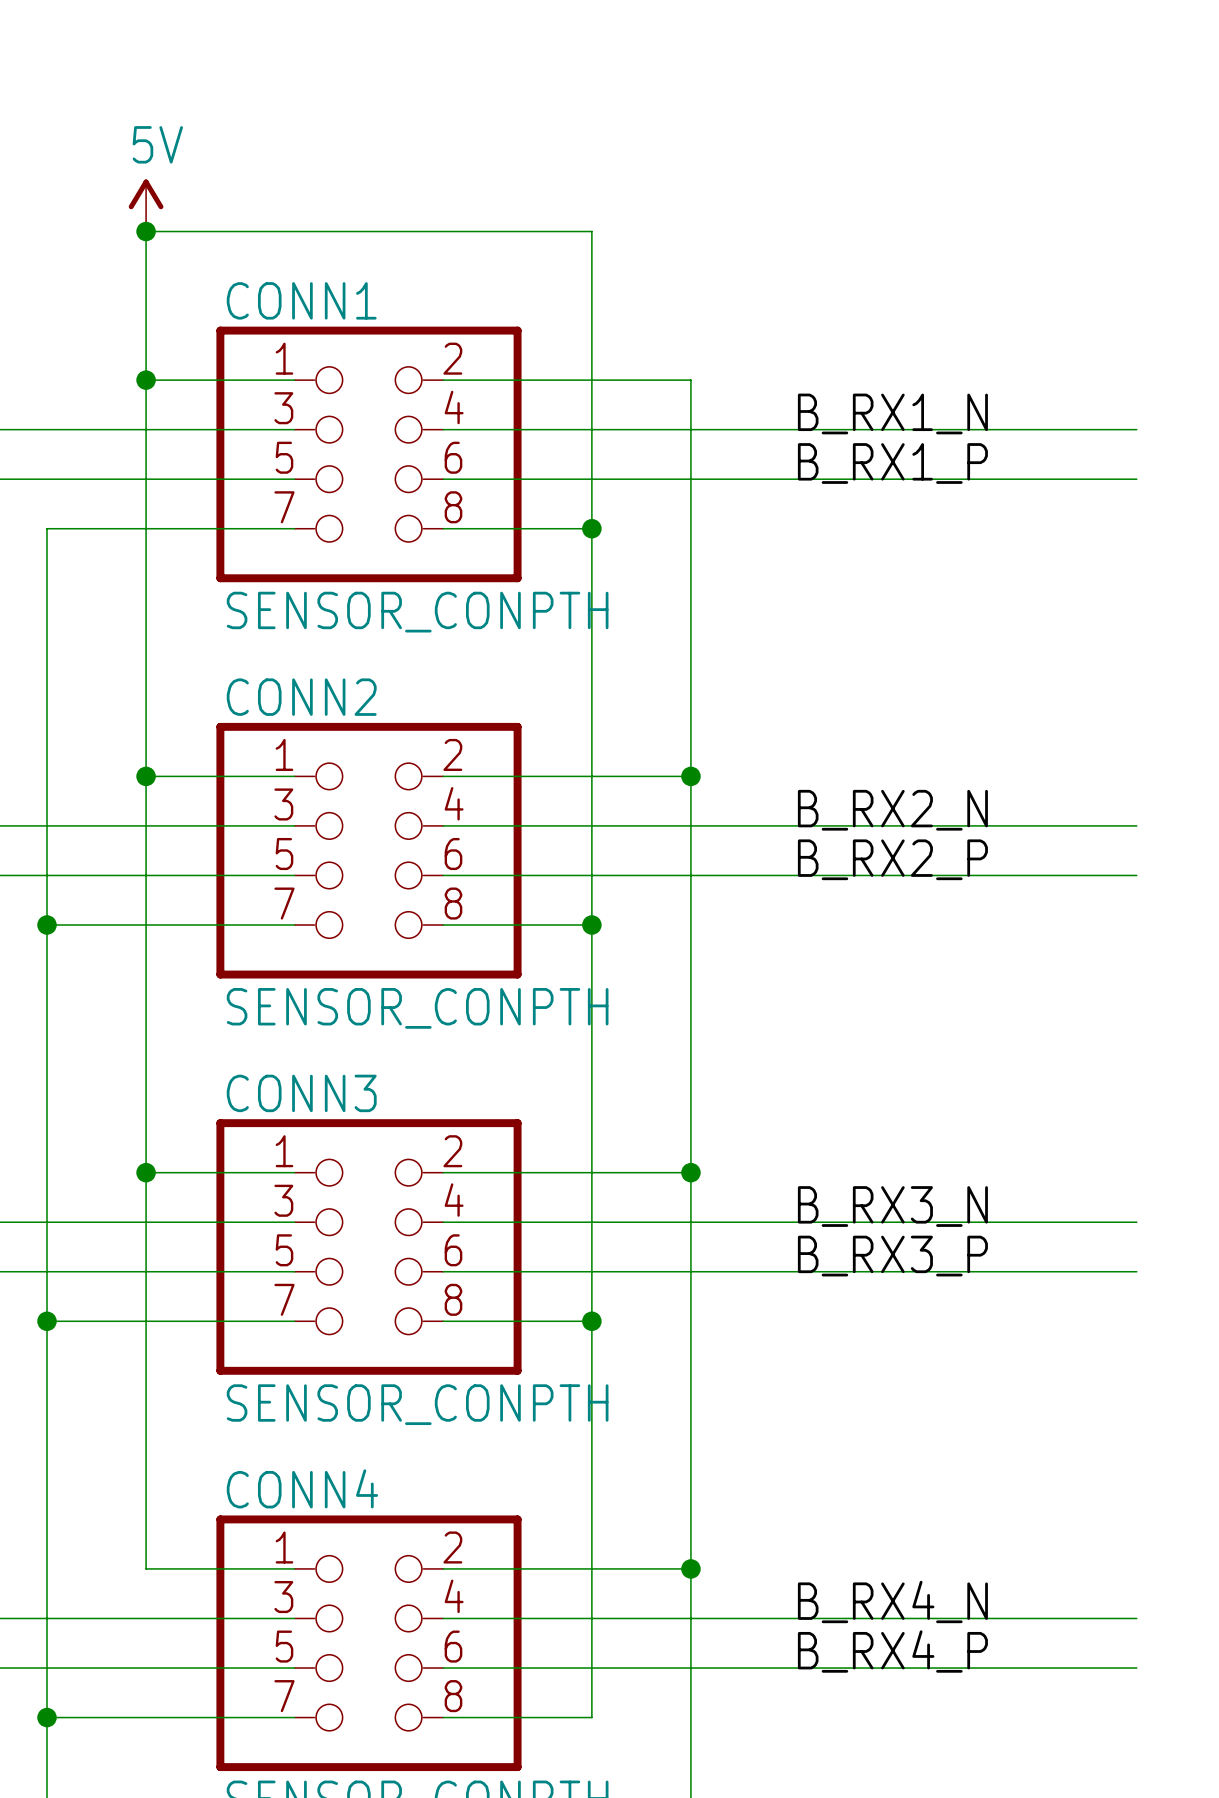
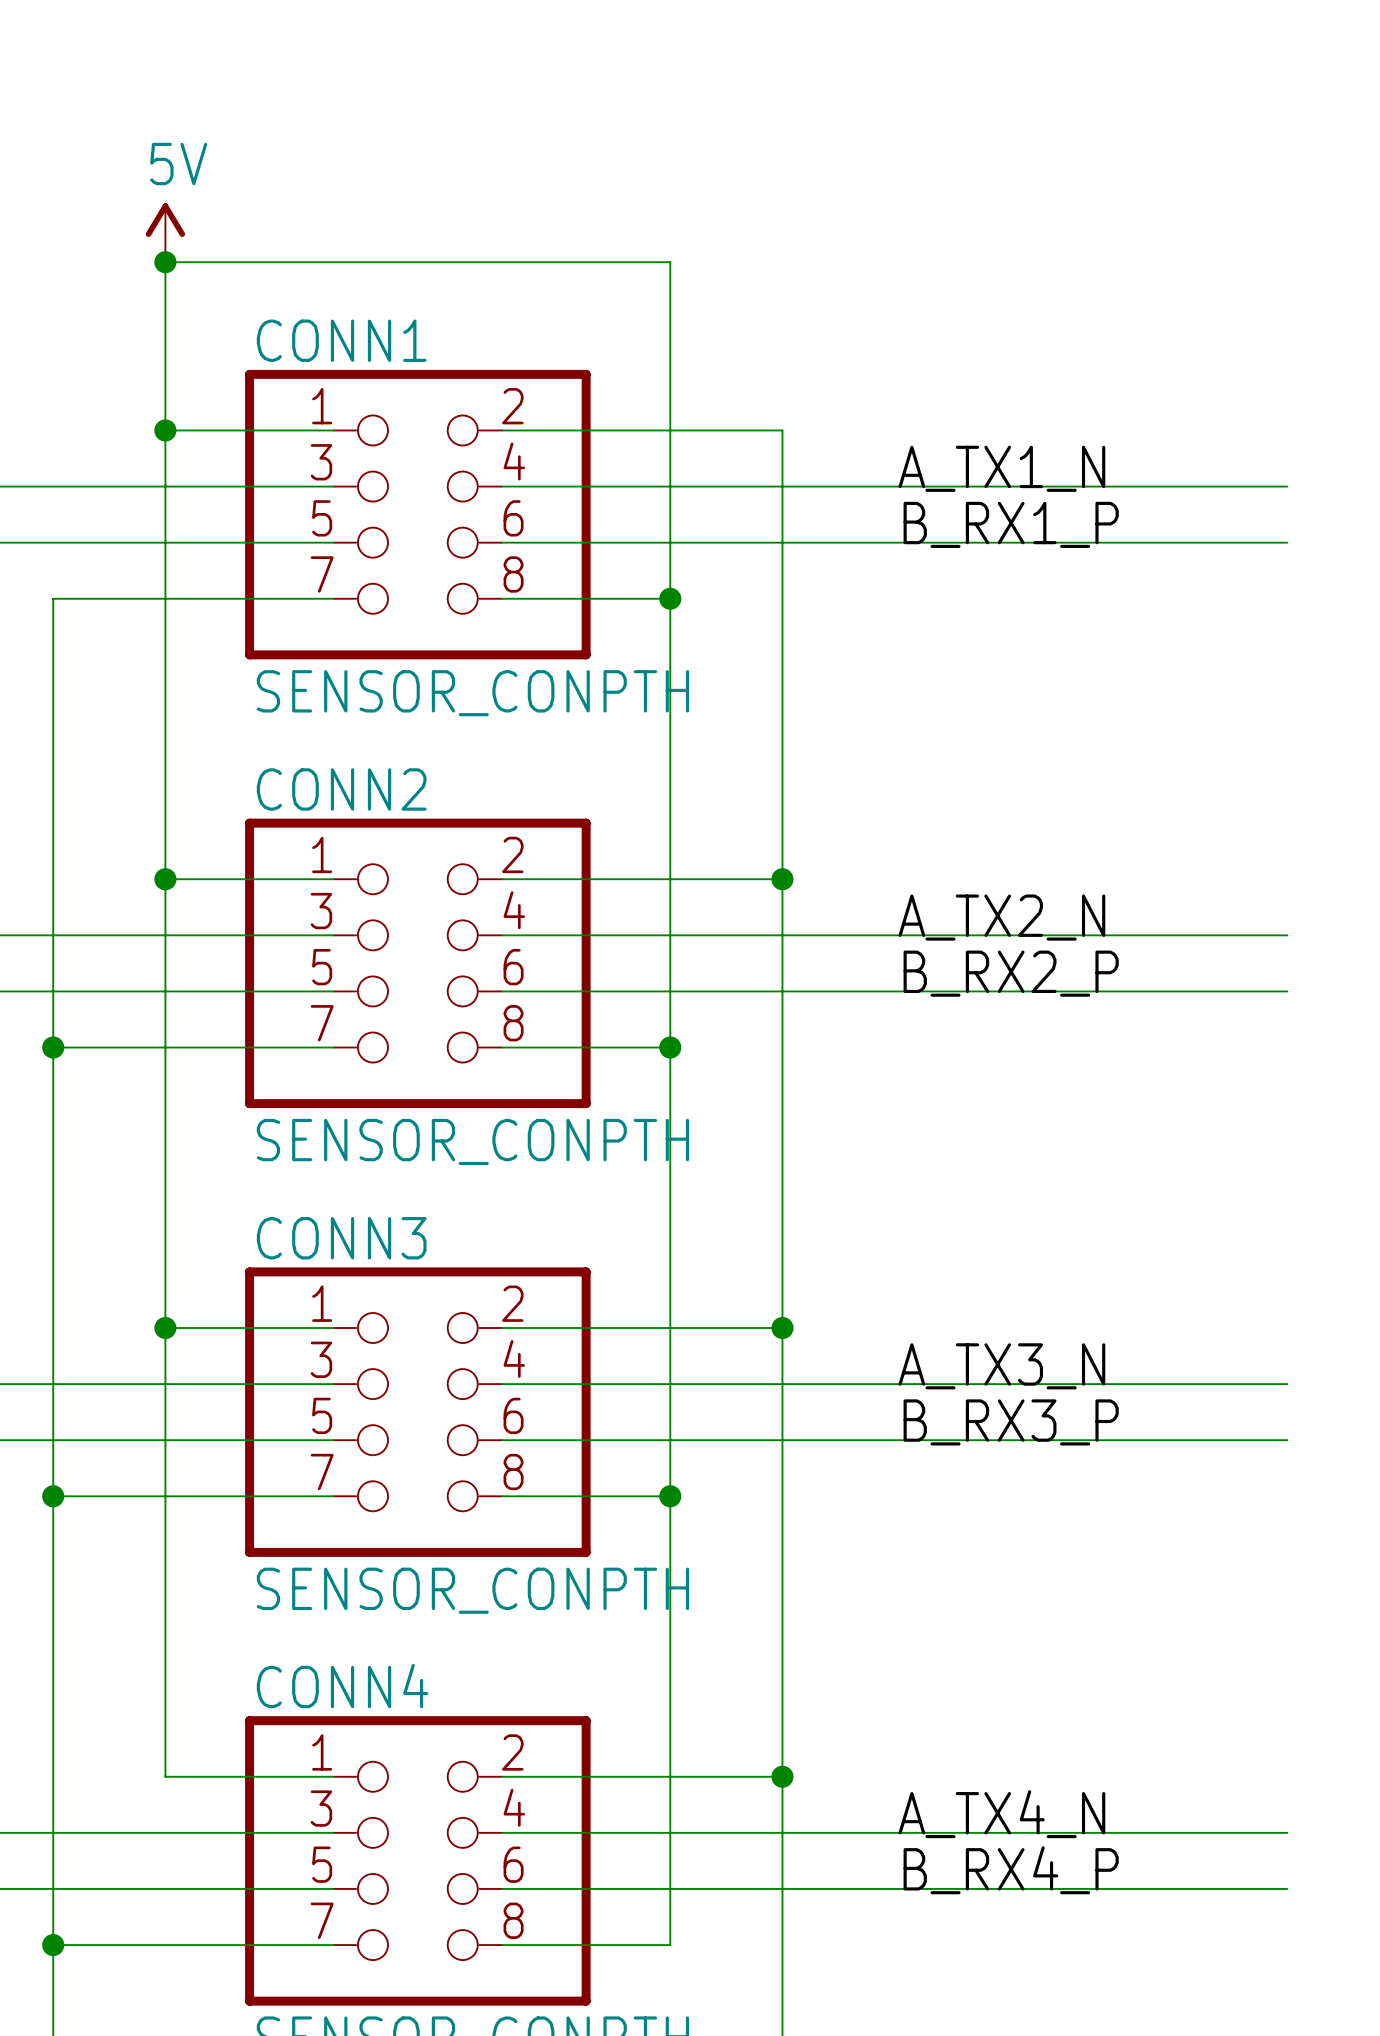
label: B_RX1_N (892, 413) -> A_TX1_N (1001, 468)
label: B_RX2_N (892, 810) -> A_TX2_N (1001, 917)
label: B_RX3_N (892, 1206) -> A_TX3_N (1001, 1366)
label: B_RX4_N (892, 1601) -> A_TX4_N (1001, 1814)

